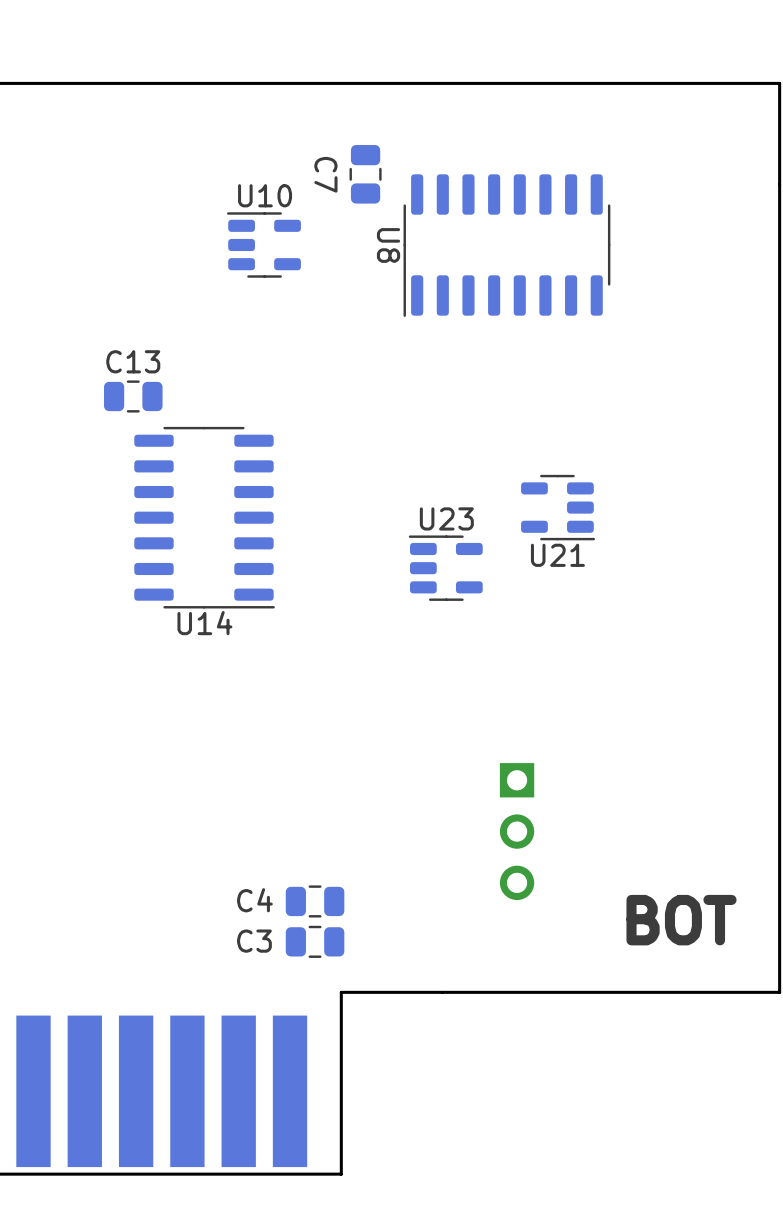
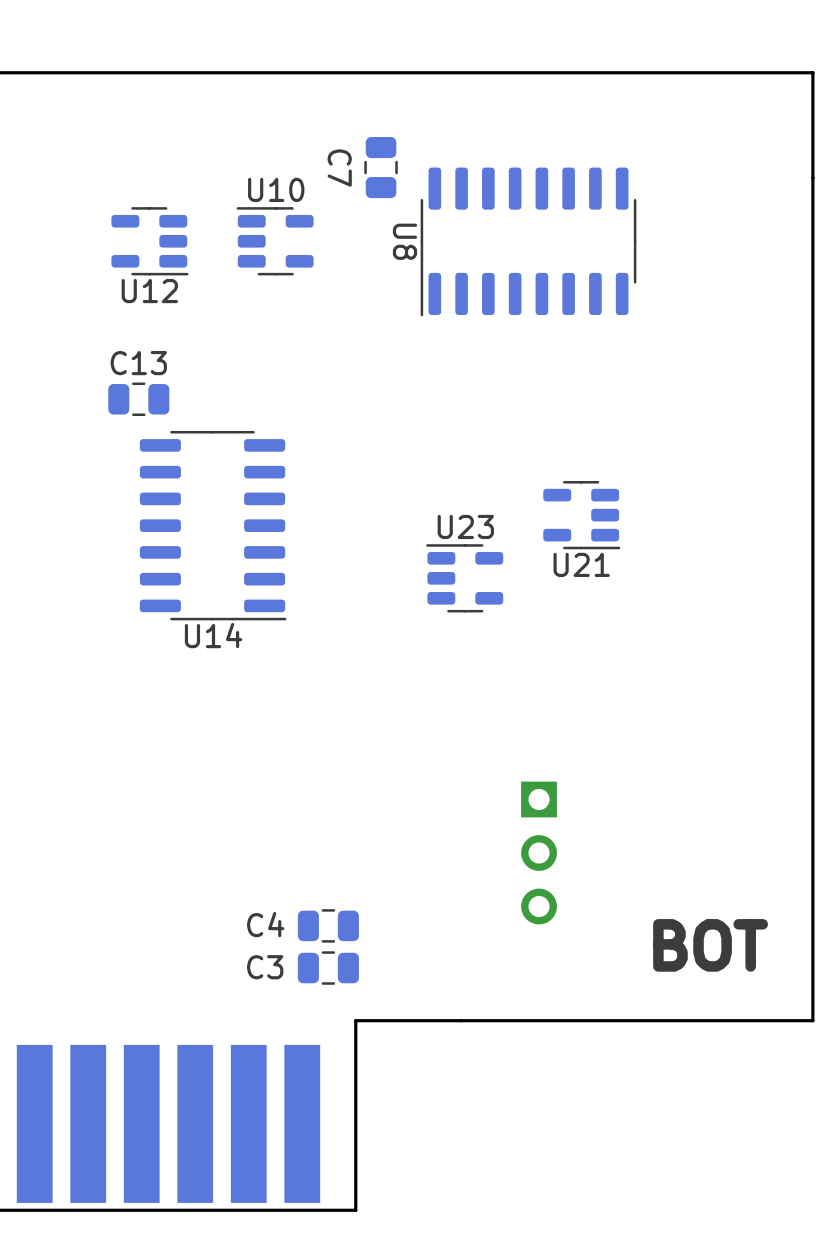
U12: none -> (149, 241)

